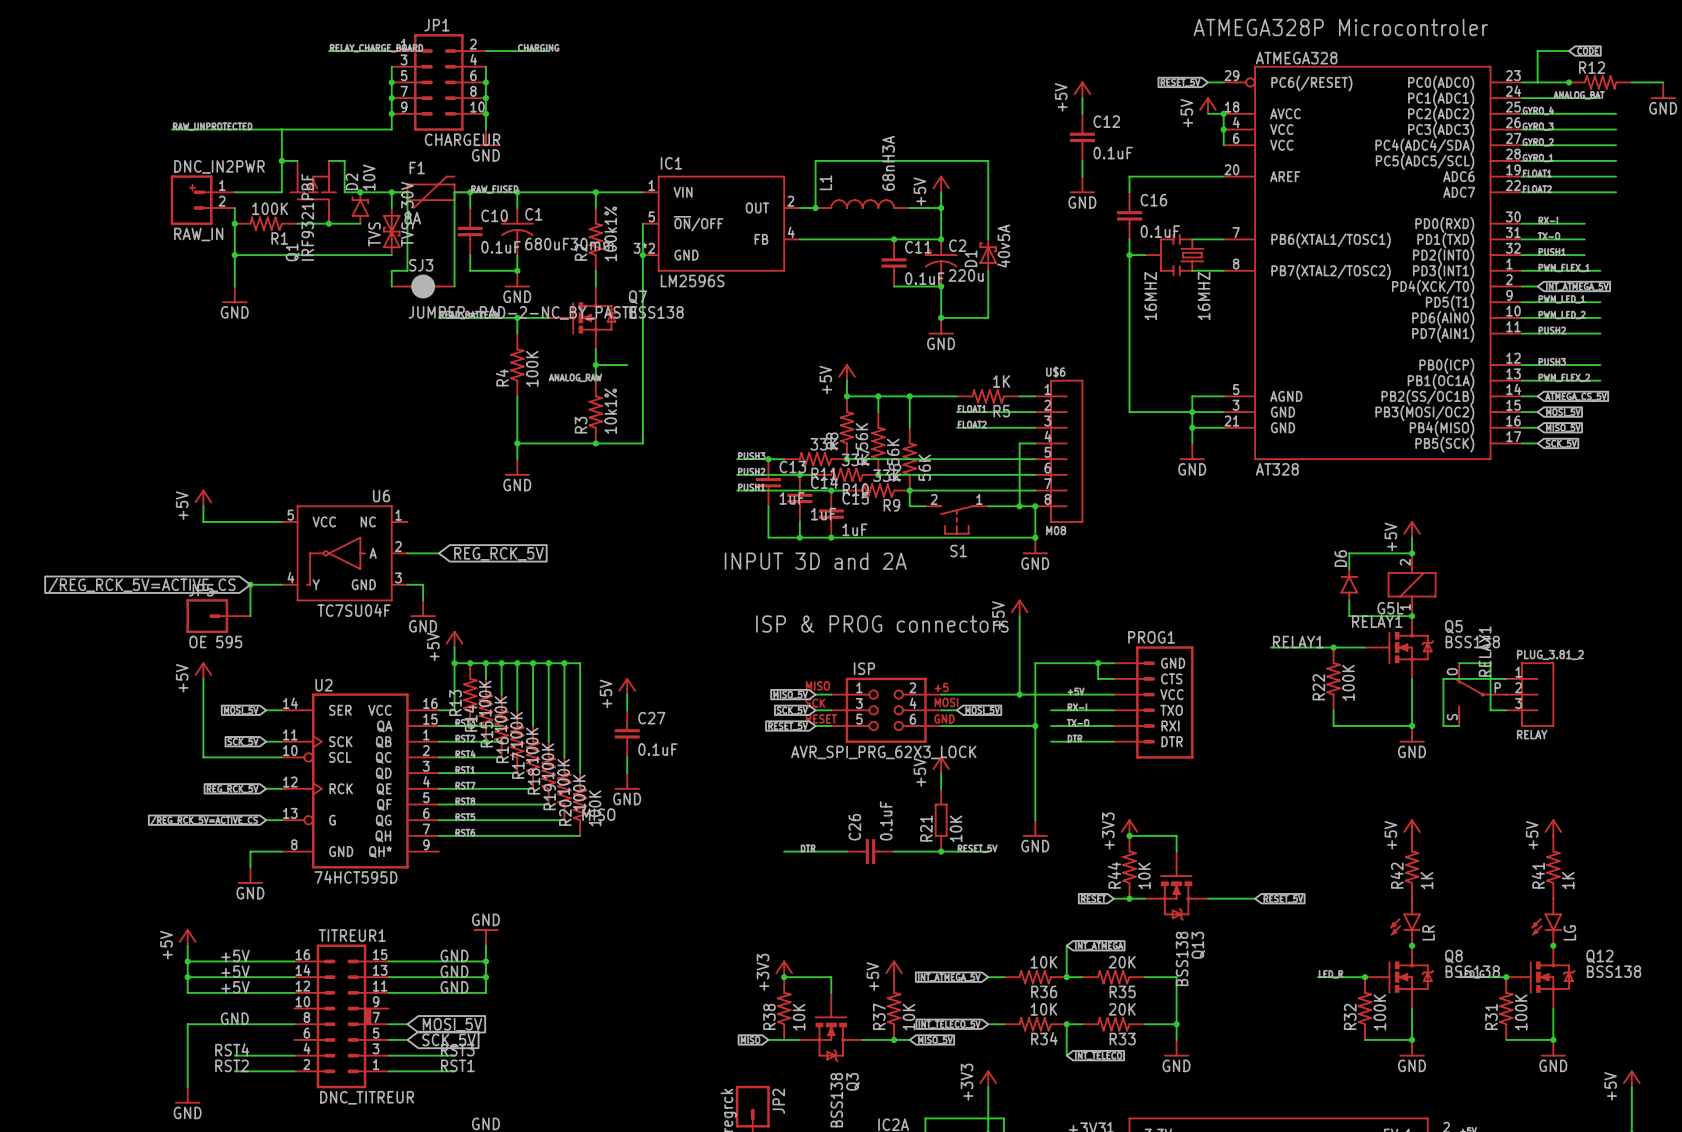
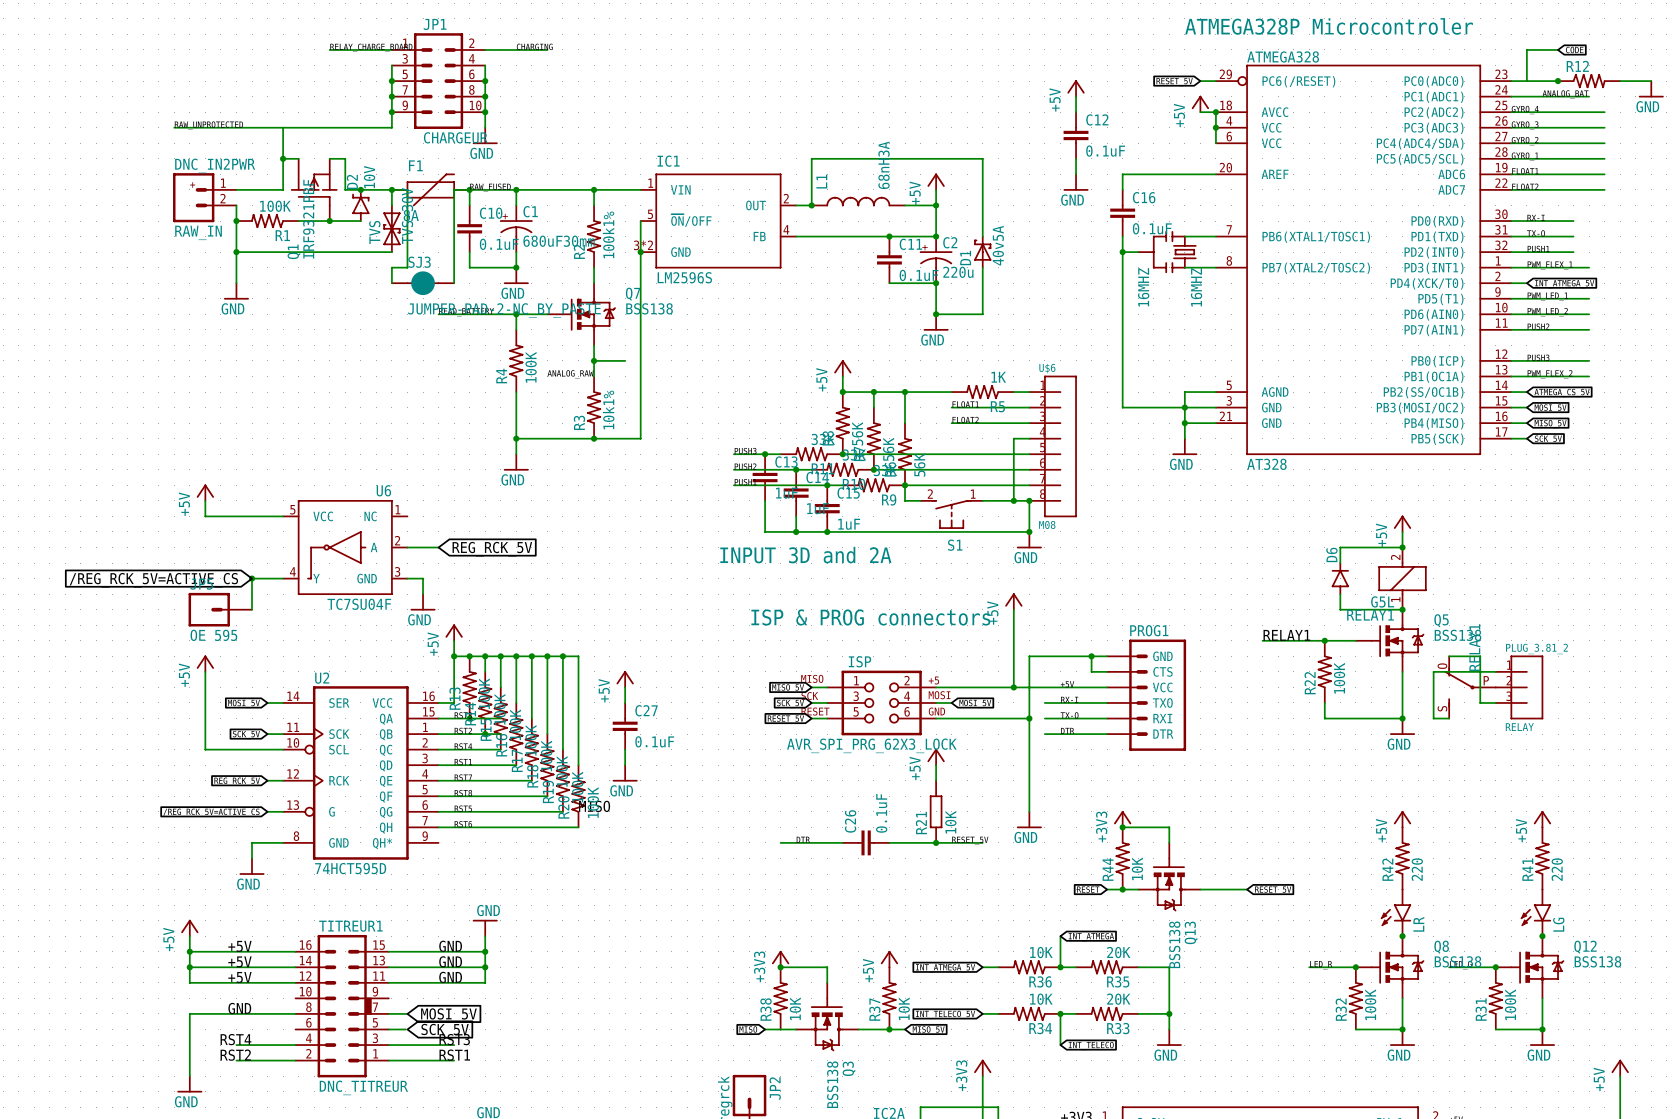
R42 value: 1K (1426, 880) -> 220 (1417, 869)
R41 value: 1K (1568, 880) -> 220 (1557, 869)

